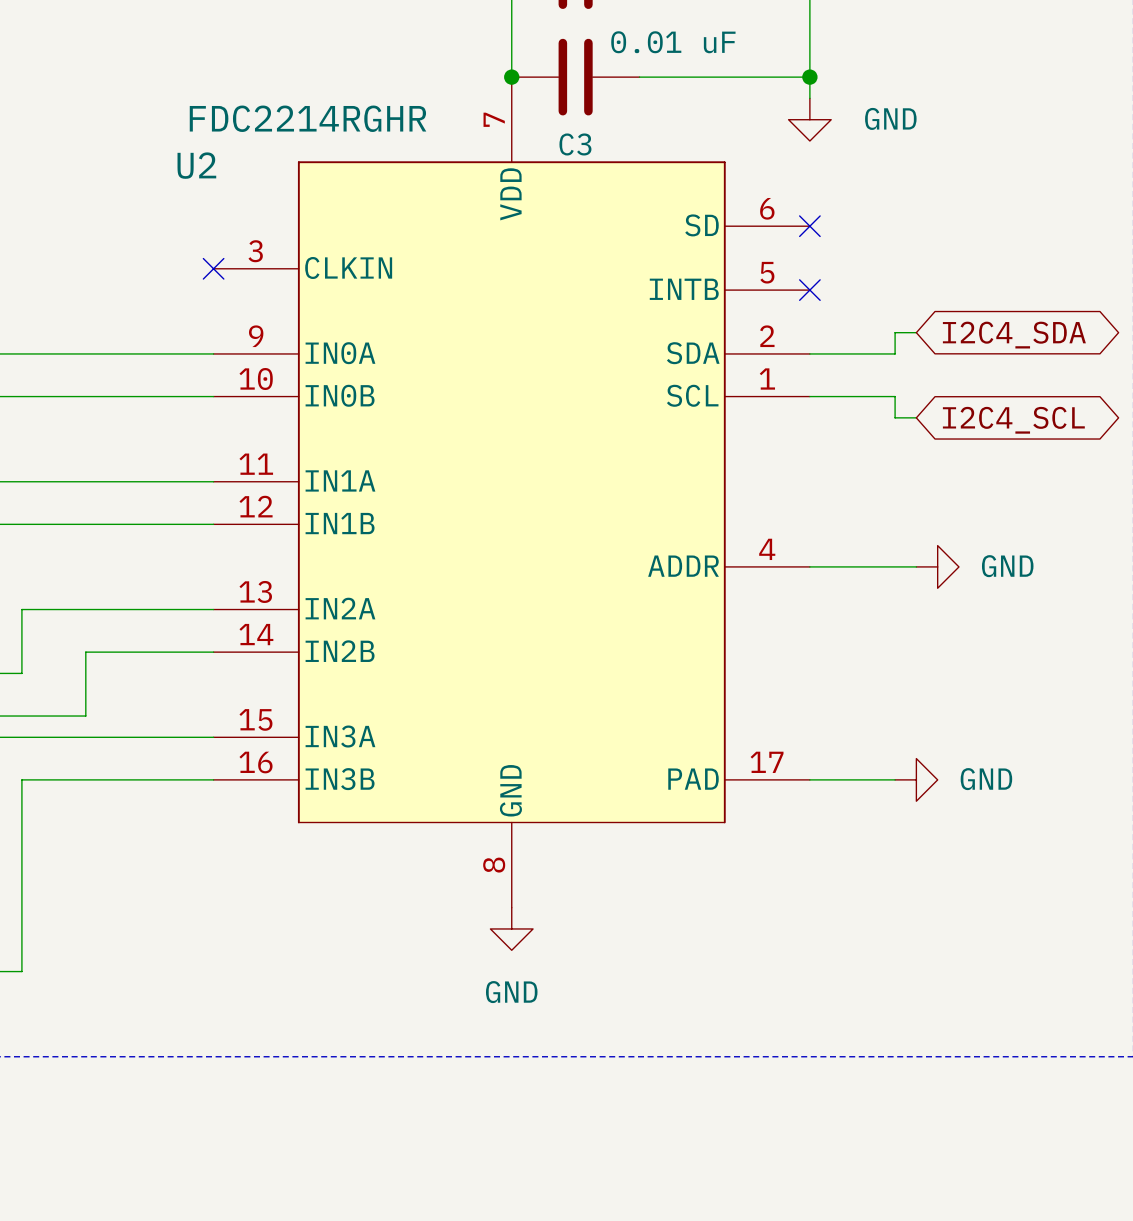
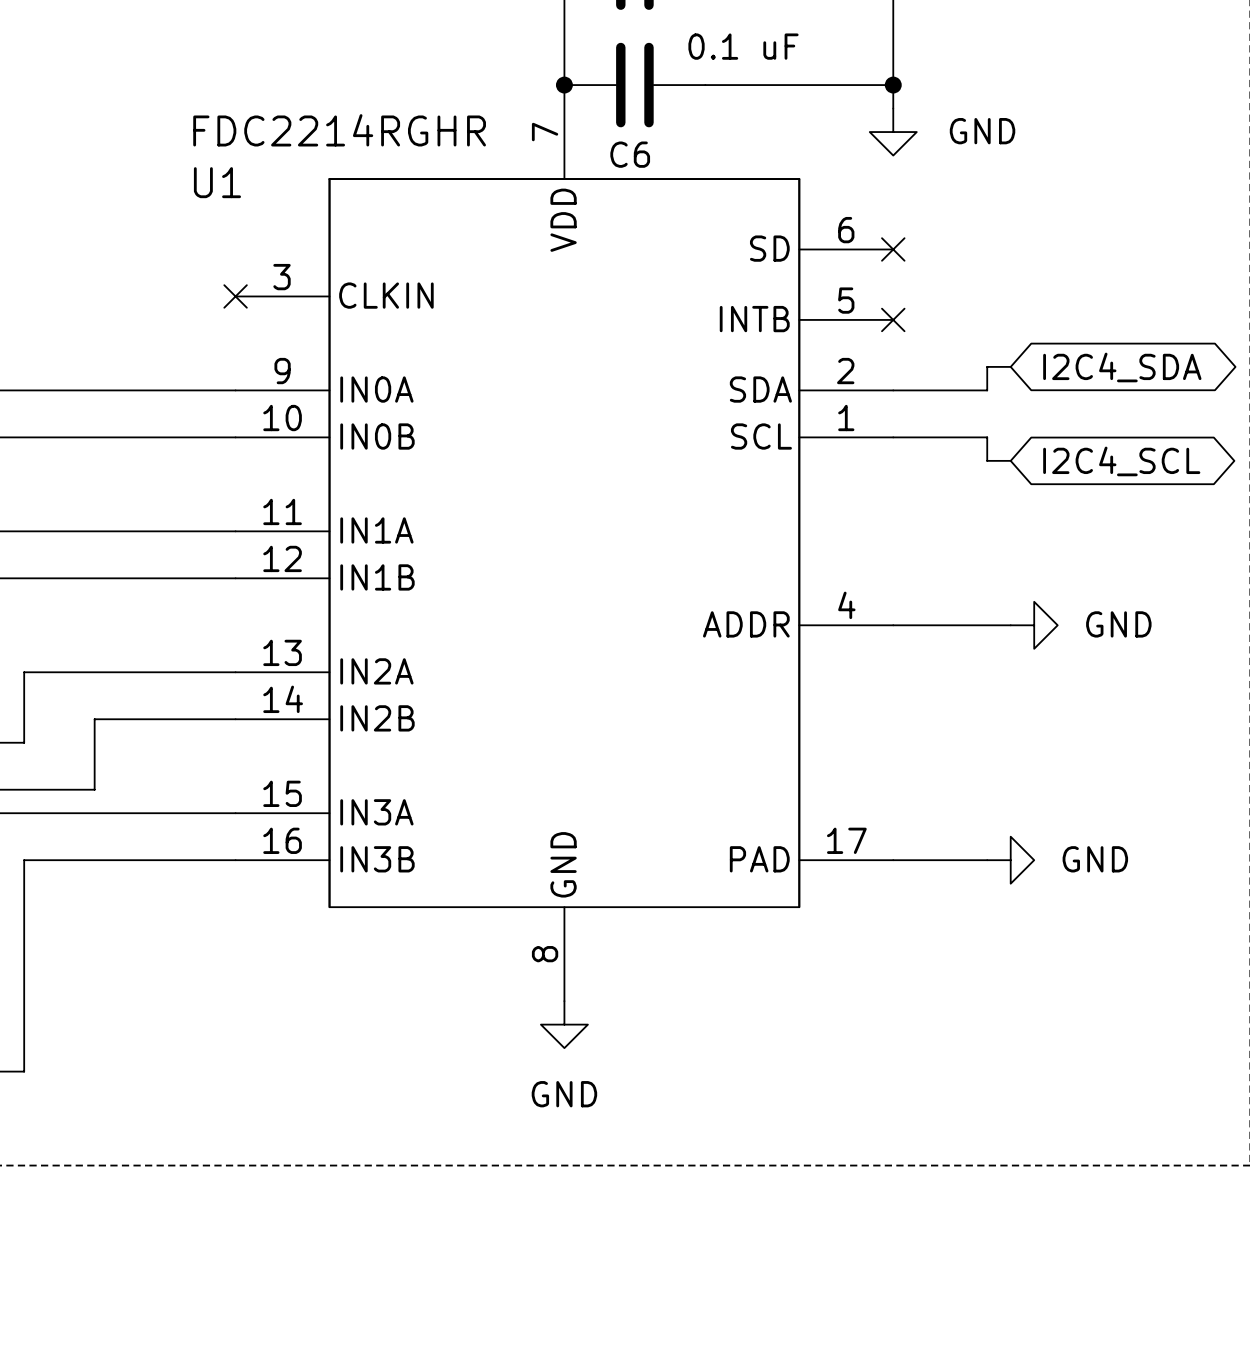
C3 value: 0.01 uF (673, 42) -> 0.1 uF (743, 46)
C3 name: C3 (575, 144) -> C6 (630, 154)
U2 name: U2 (196, 165) -> U1 (217, 182)

